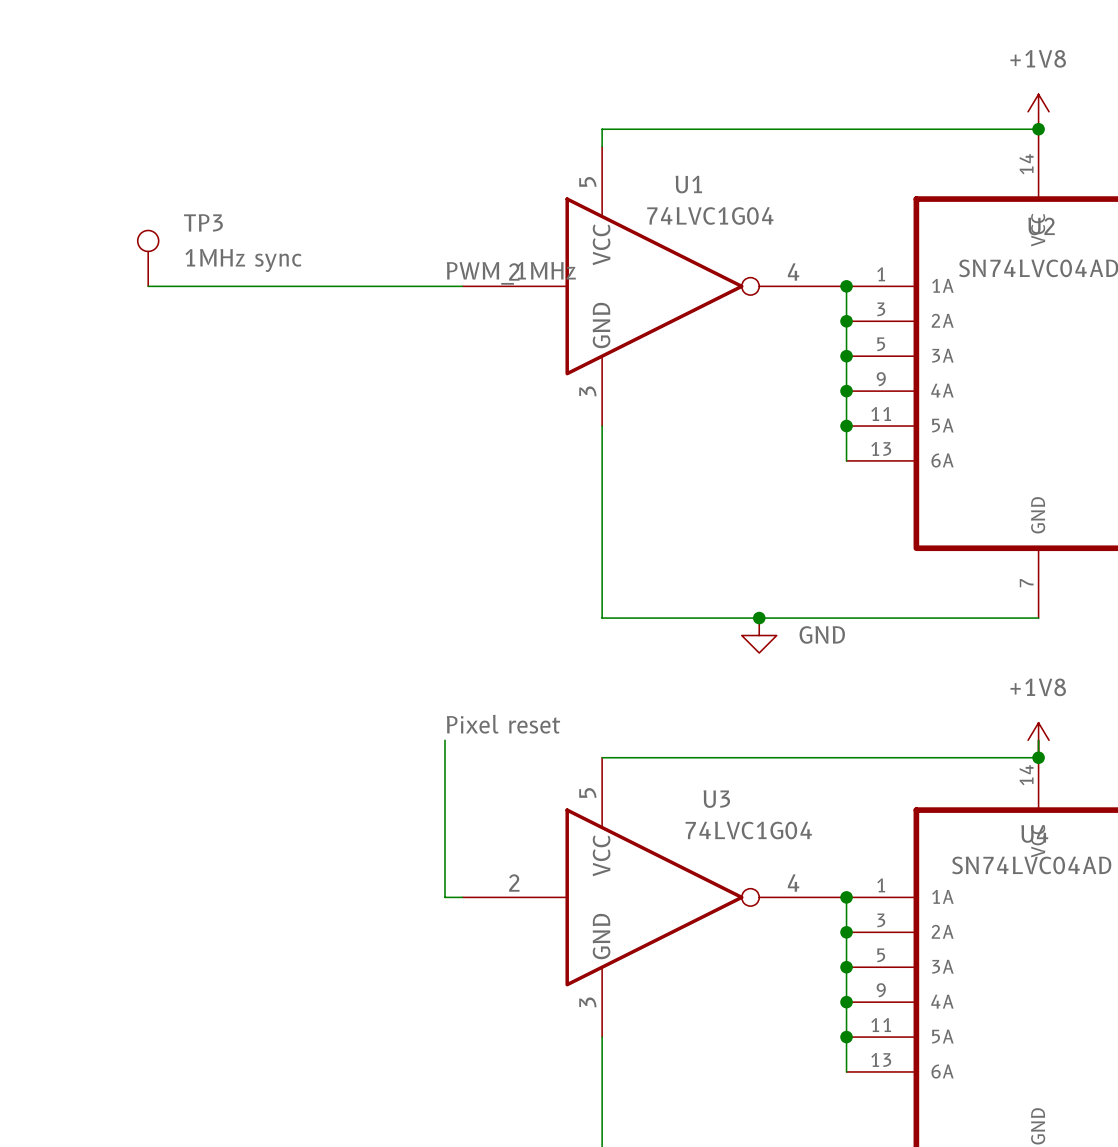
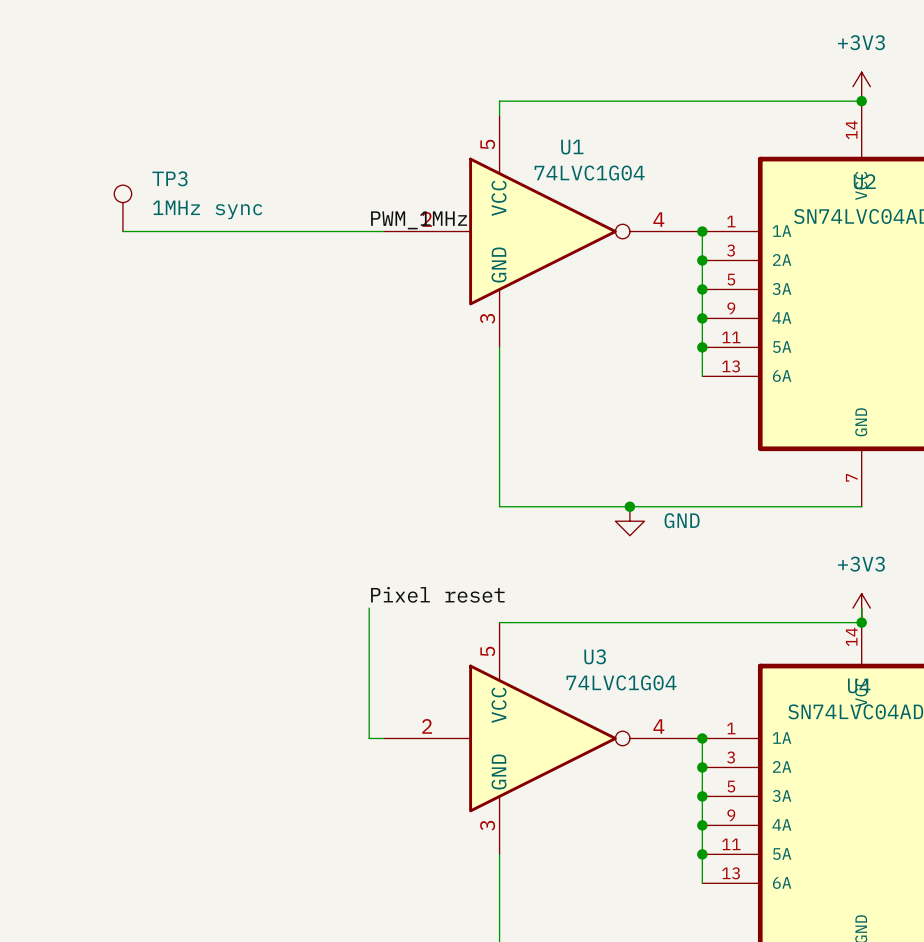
power symbol: +1V8 (1038, 111) -> +3V3 (861, 86)
power symbol: +1V8 (1038, 740) -> +3V3 (861, 608)

